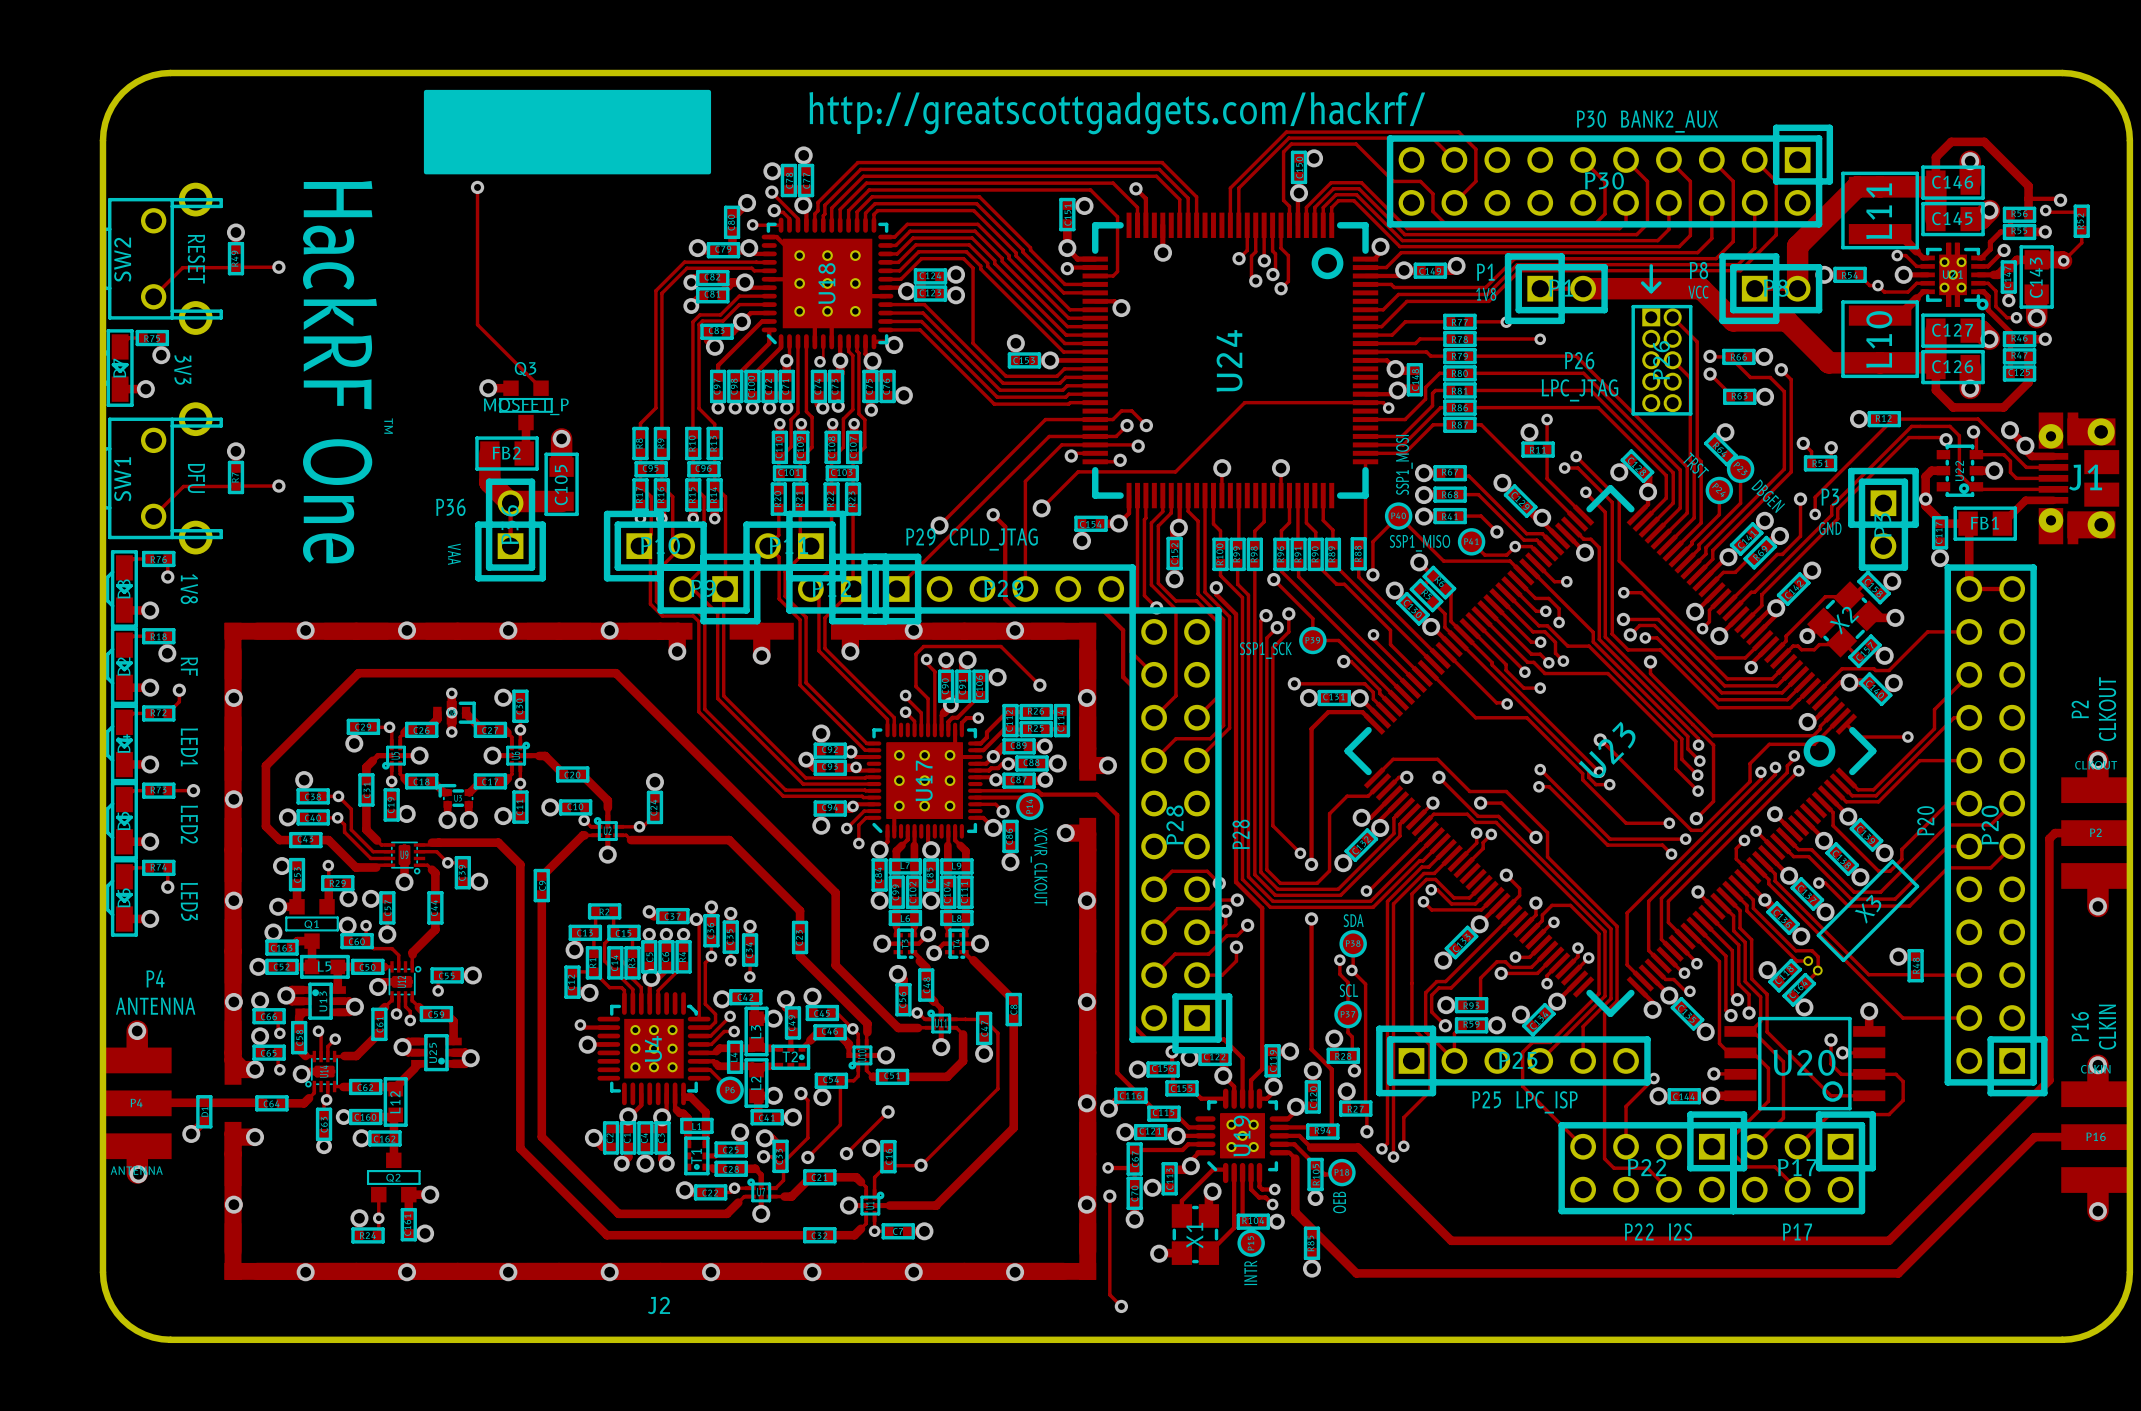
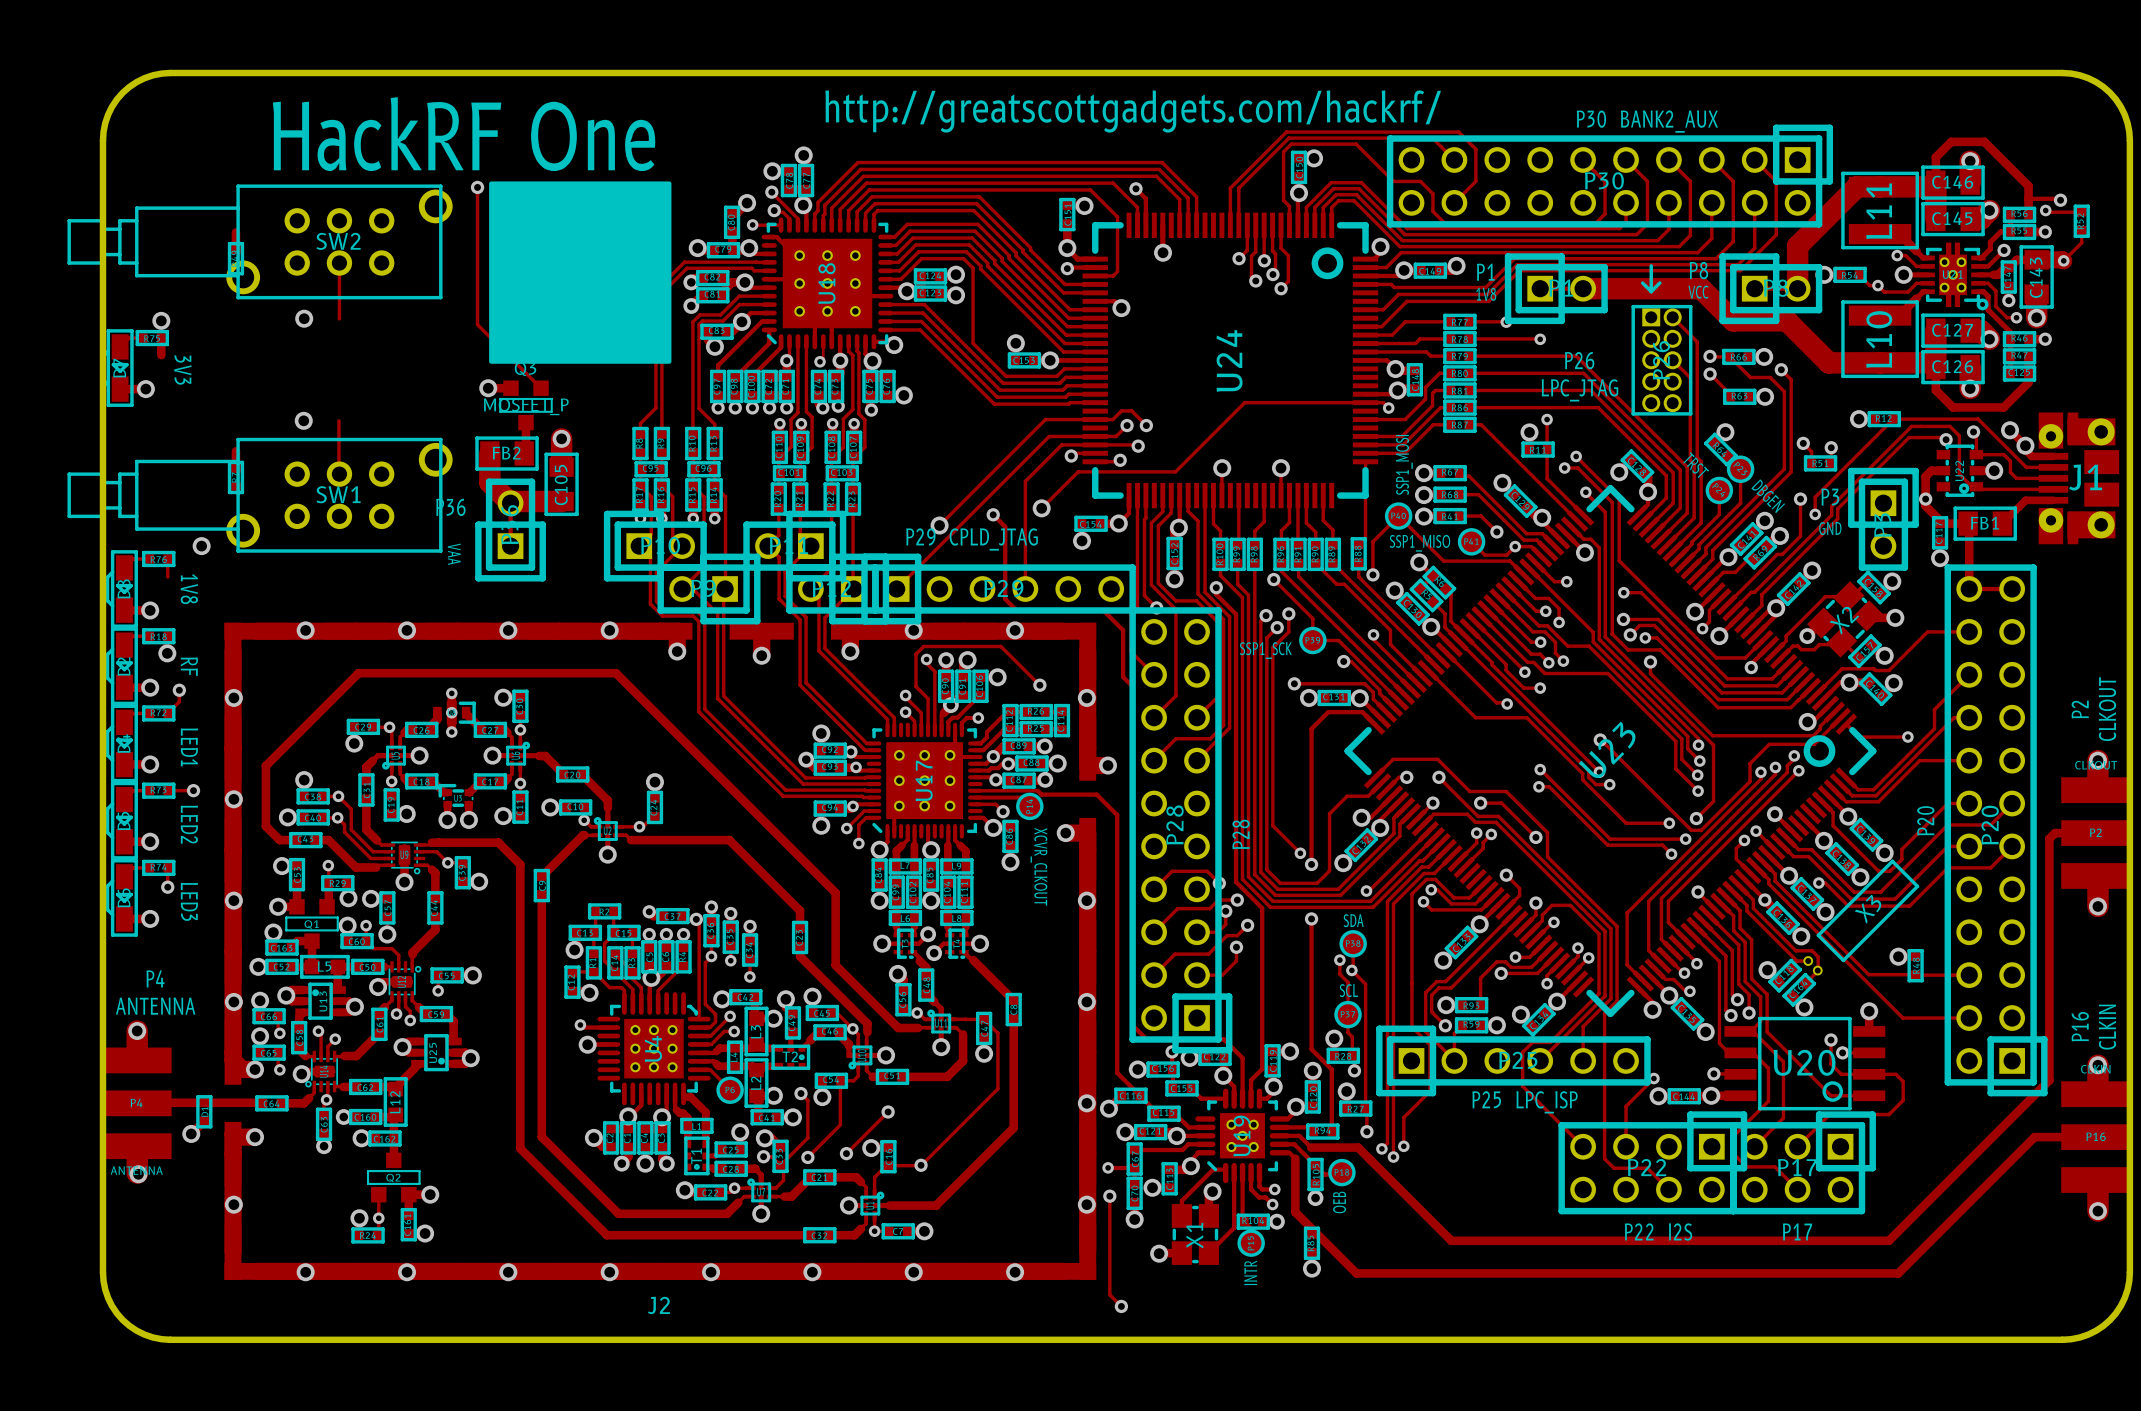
drawing: [423, 89, 712, 175] -> none
text position: http://greatscottgadgets.com/hackrf/ (1117, 113) -> http://greatscottgadgets.com/hackrf/ (1133, 111)
drawing: none -> [489, 181, 672, 364]
SW2 footprint: [102, 182, 223, 335] -> [67, 184, 453, 300]
via: (235, 232) -> none
SW2 name position: SW2 (122, 259) -> SW2 (338, 241)
text: RESET (196, 259) -> none
track: none -> (339, 263) (339, 318)
track: (278, 267) (182, 267) (153, 296) -> none
via: (278, 267) -> none
via: none -> (304, 318)
via position: (161, 355) -> (161, 320)
text rotation: 0° (339, 372) -> 90° counterclockwise (464, 134)
SW1 footprint: [102, 402, 223, 555] -> [67, 437, 453, 553]
via: none -> (303, 420)
track: none -> (338, 420) (339, 474)
text: TM (388, 426) -> none
via: (235, 451) -> none
text: DFU (196, 478) -> none
SW1 name position: SW1 (122, 479) -> SW1 (338, 494)
track: (278, 486) (183, 486) (153, 516) -> none
via: (278, 486) -> none
via: none -> (201, 546)
via: (167, 577) -> none

